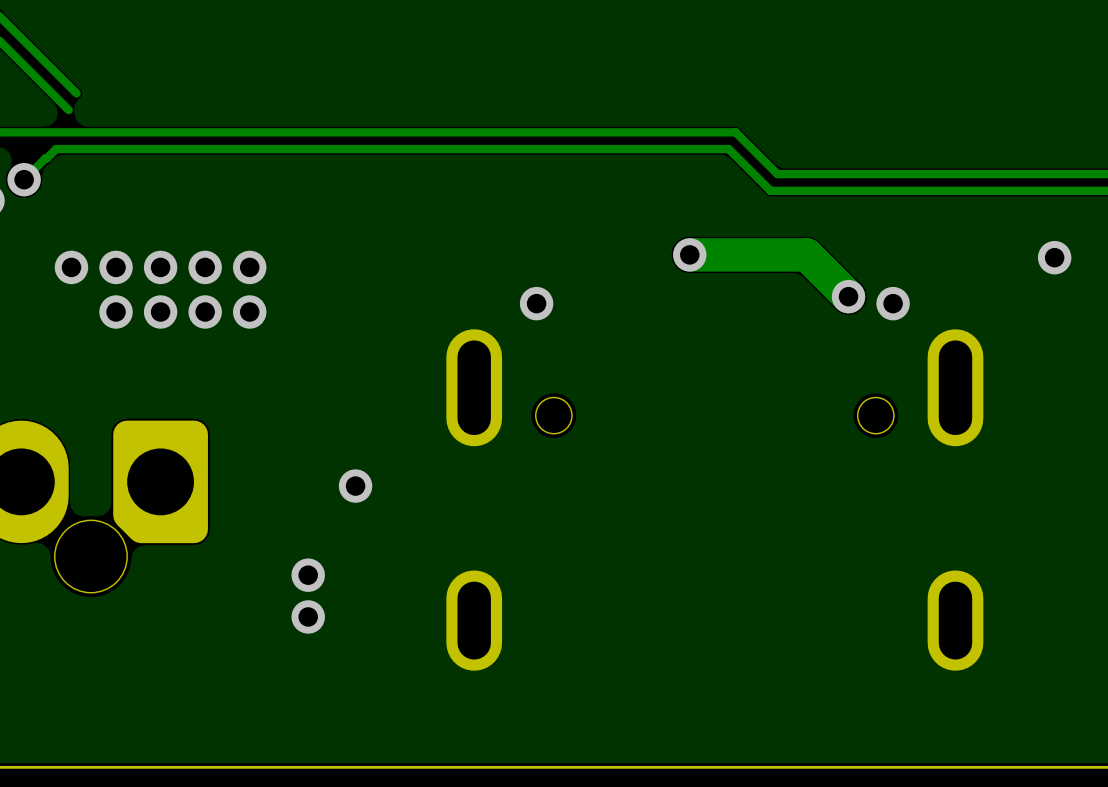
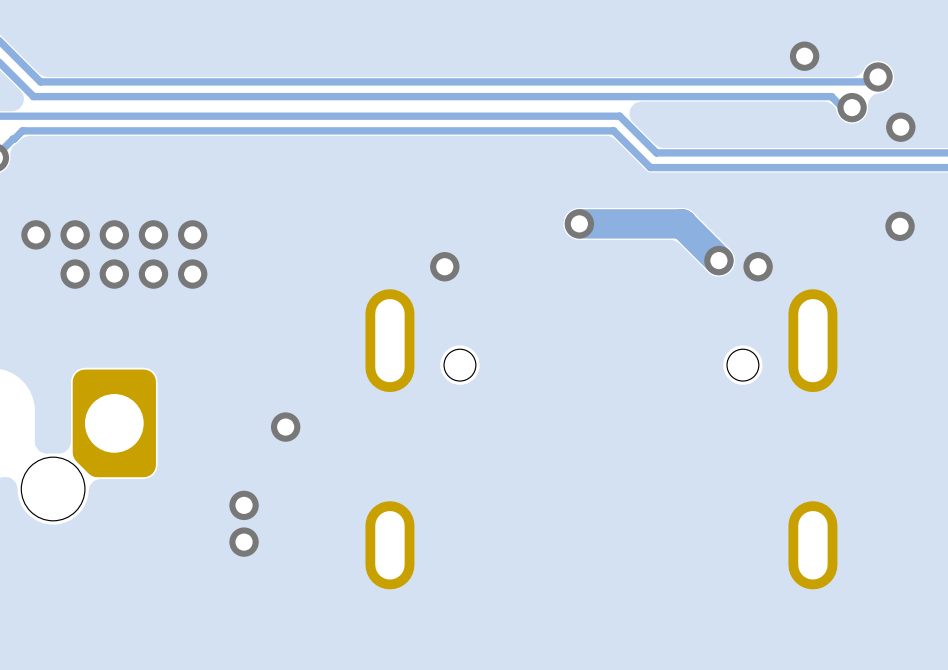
via: none -> (804, 56)
track: none -> (878, 77) (873, 77) (868, 81) (40, 81)
via: none -> (878, 77)
track: none -> (33, 96) (831, 96) (842, 107) (852, 107)
via: none -> (852, 107)
via: none -> (900, 127)

